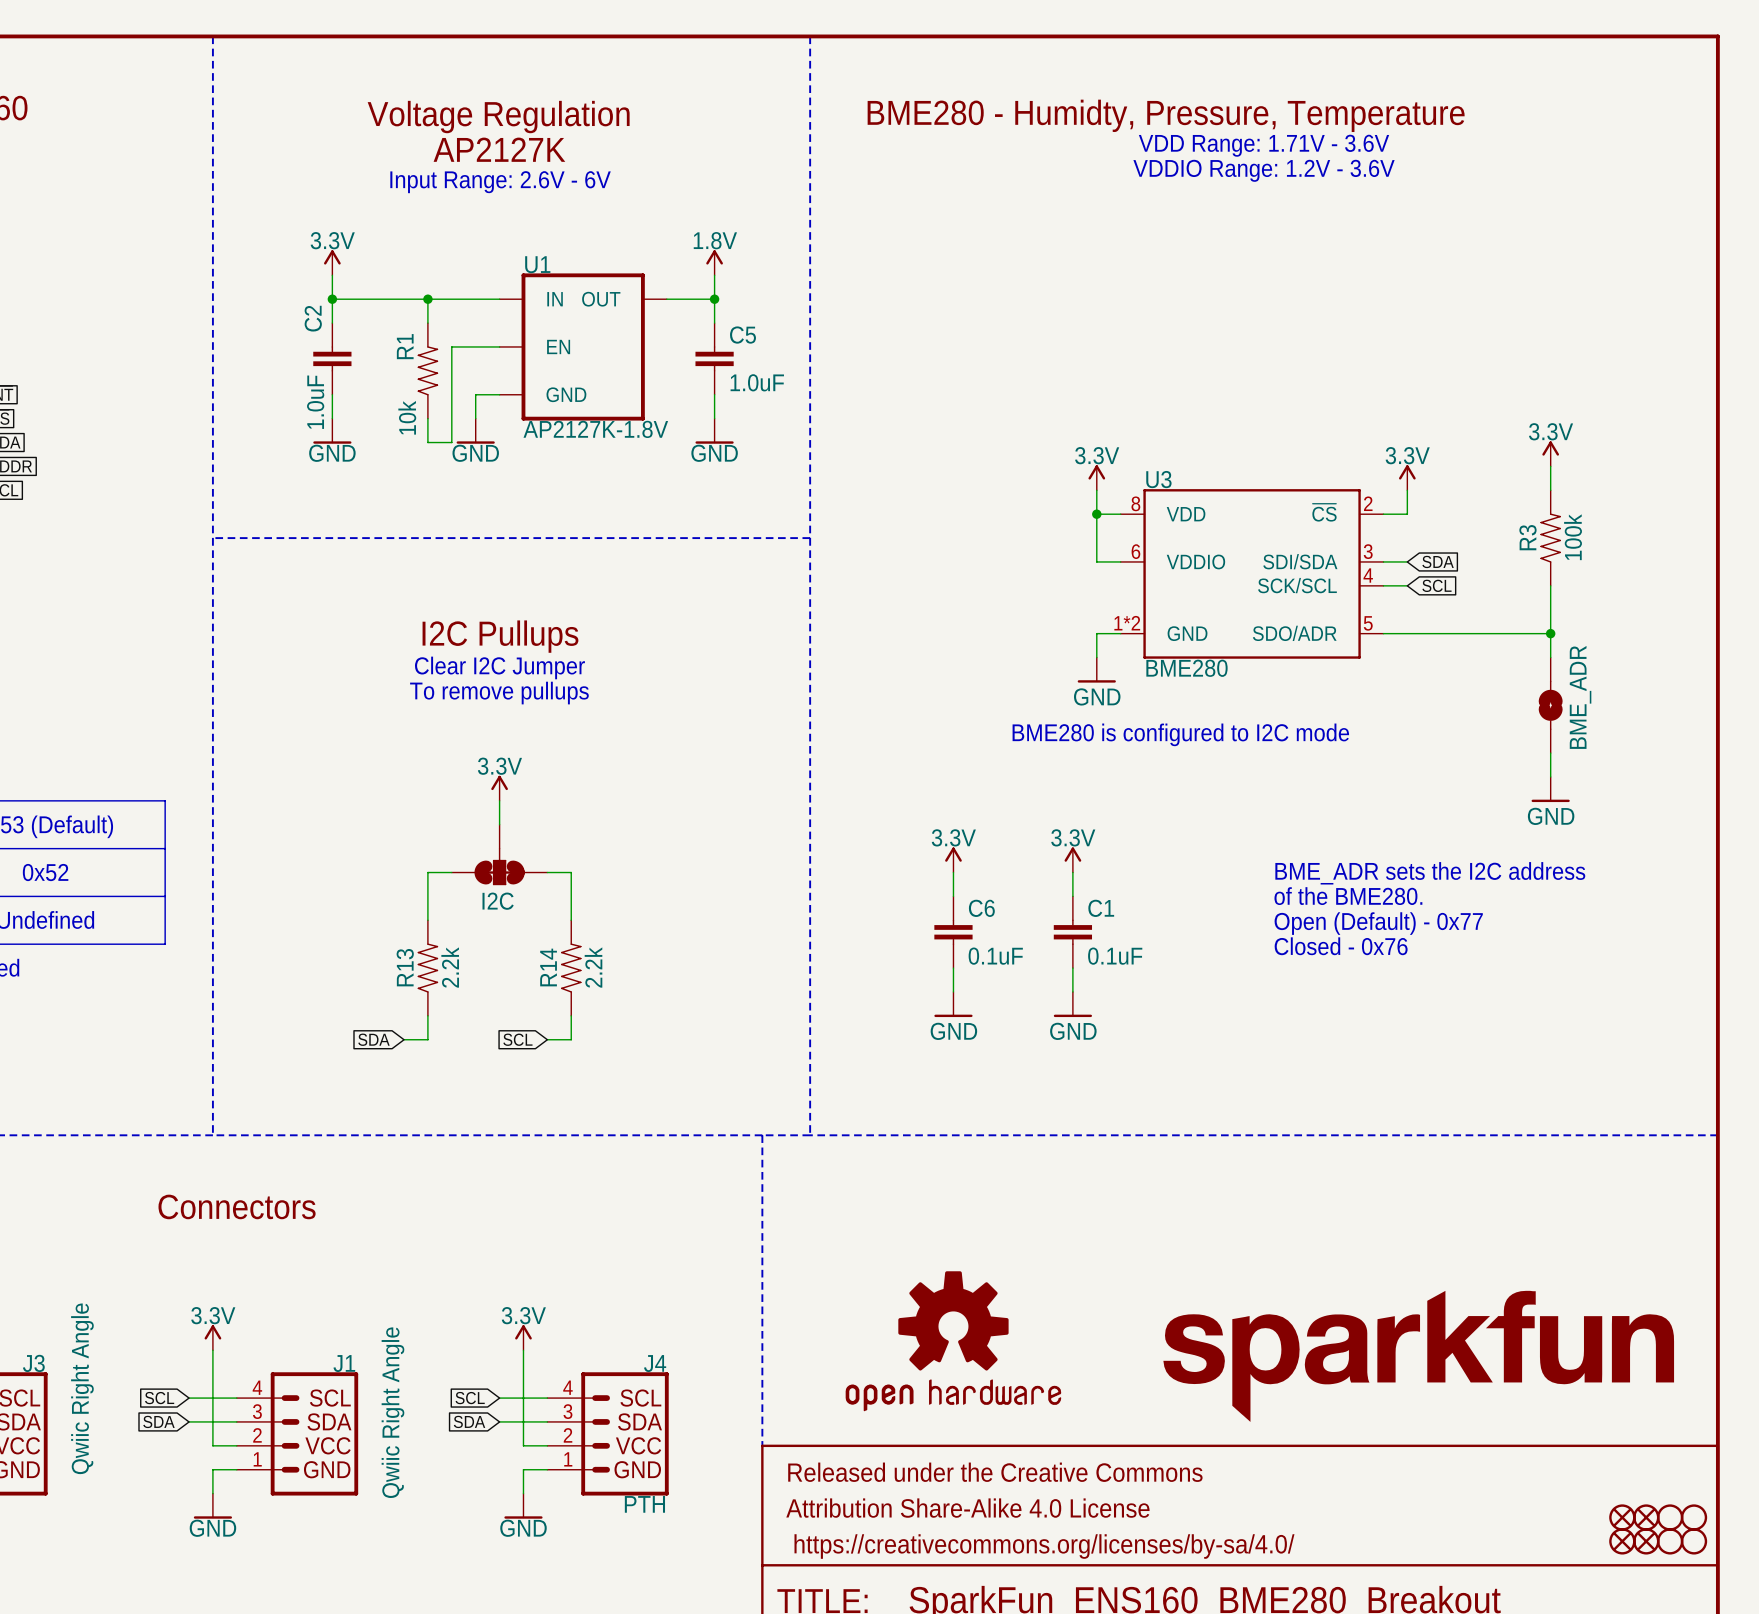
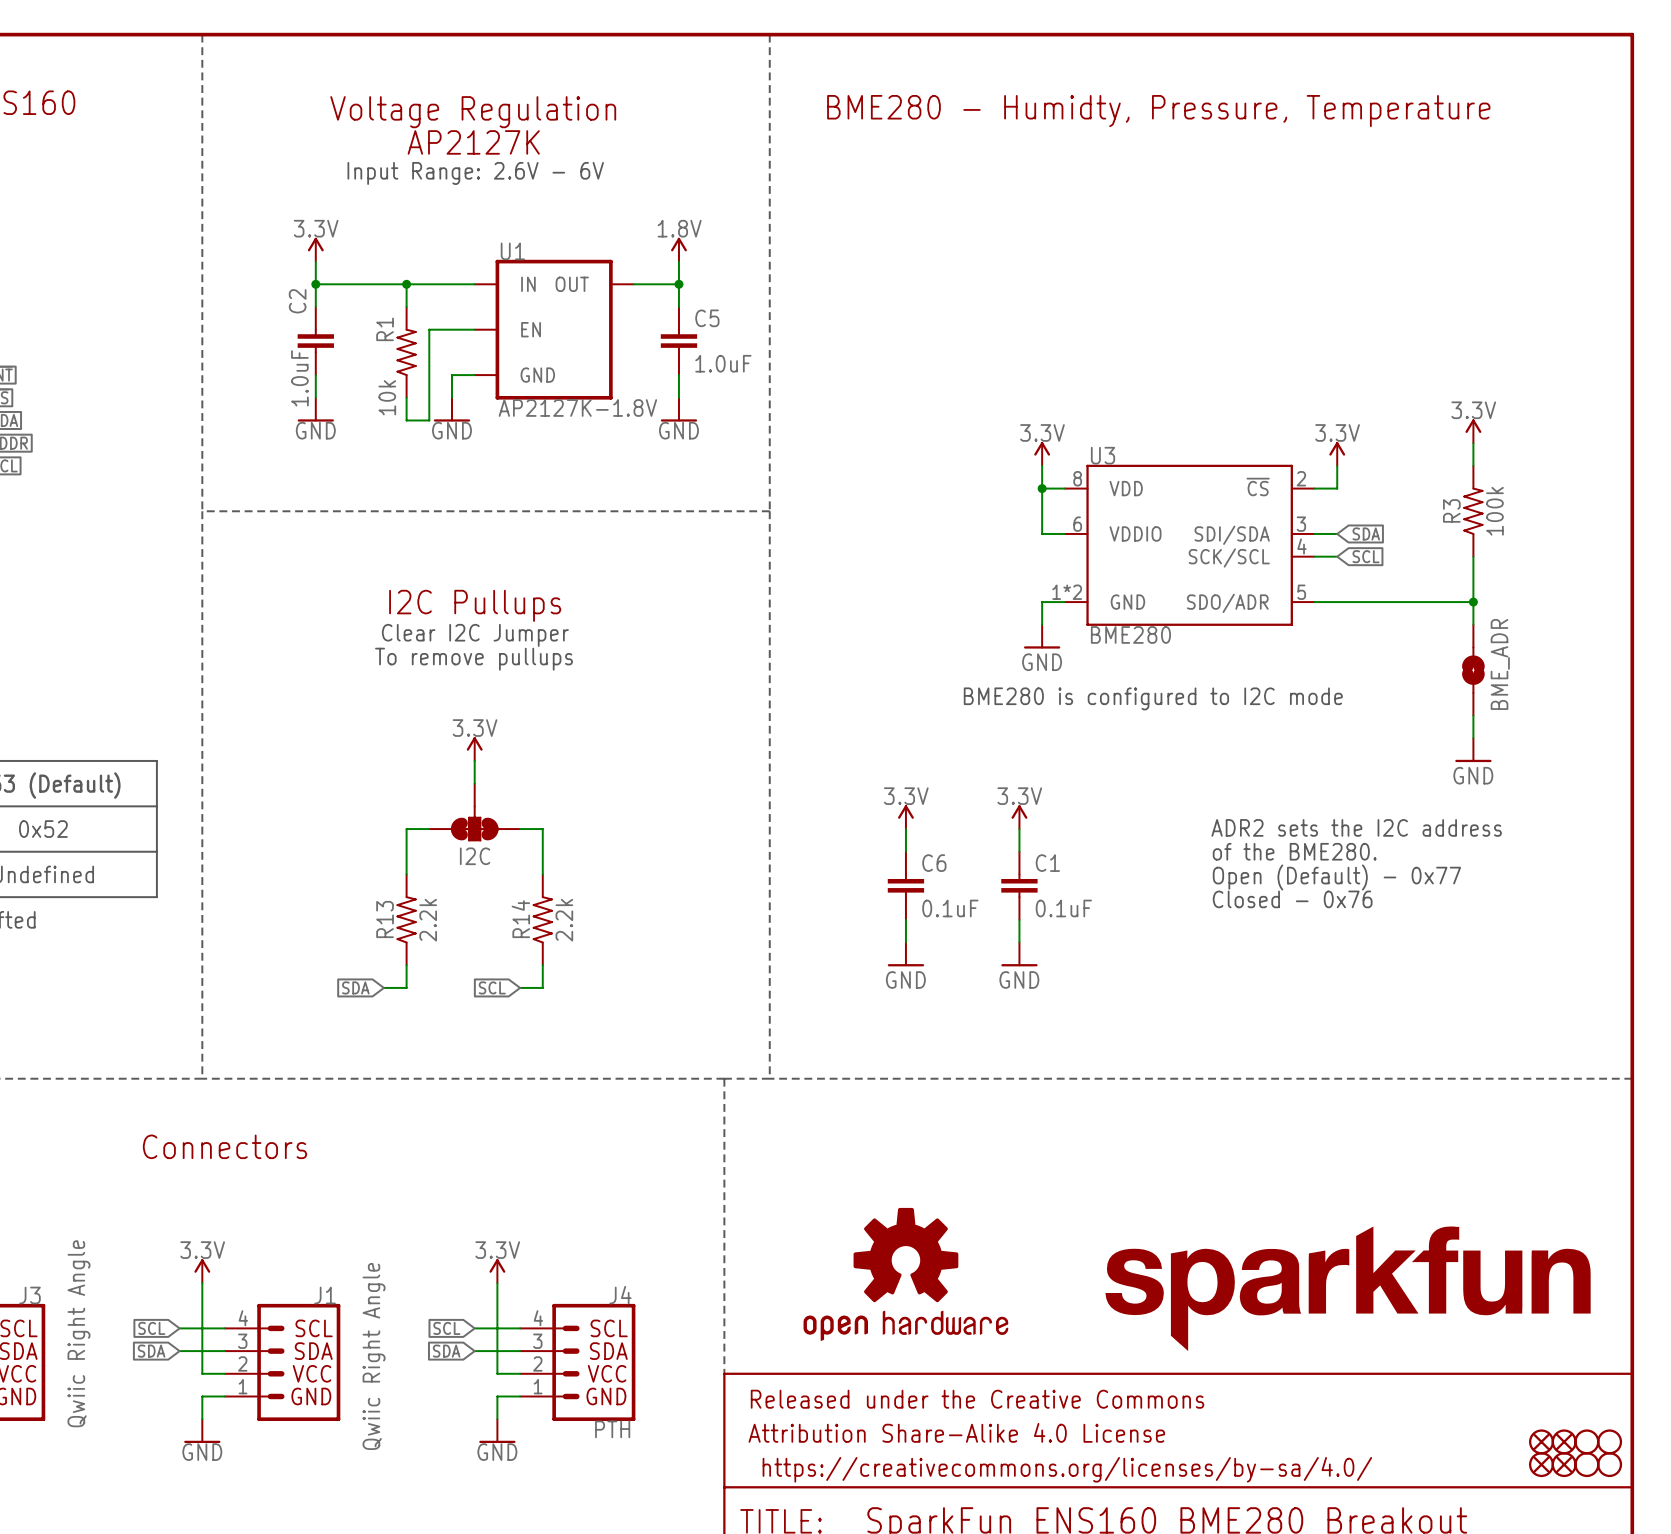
text: VDD Range: 1.71V - 3.6V (1264, 145) -> none
text: VDDIO Range: 1.2V - 3.6V (1264, 170) -> none
text: BME_ADR sets the I2C address (1430, 873) -> ADR2 sets the I2C address (1356, 827)

